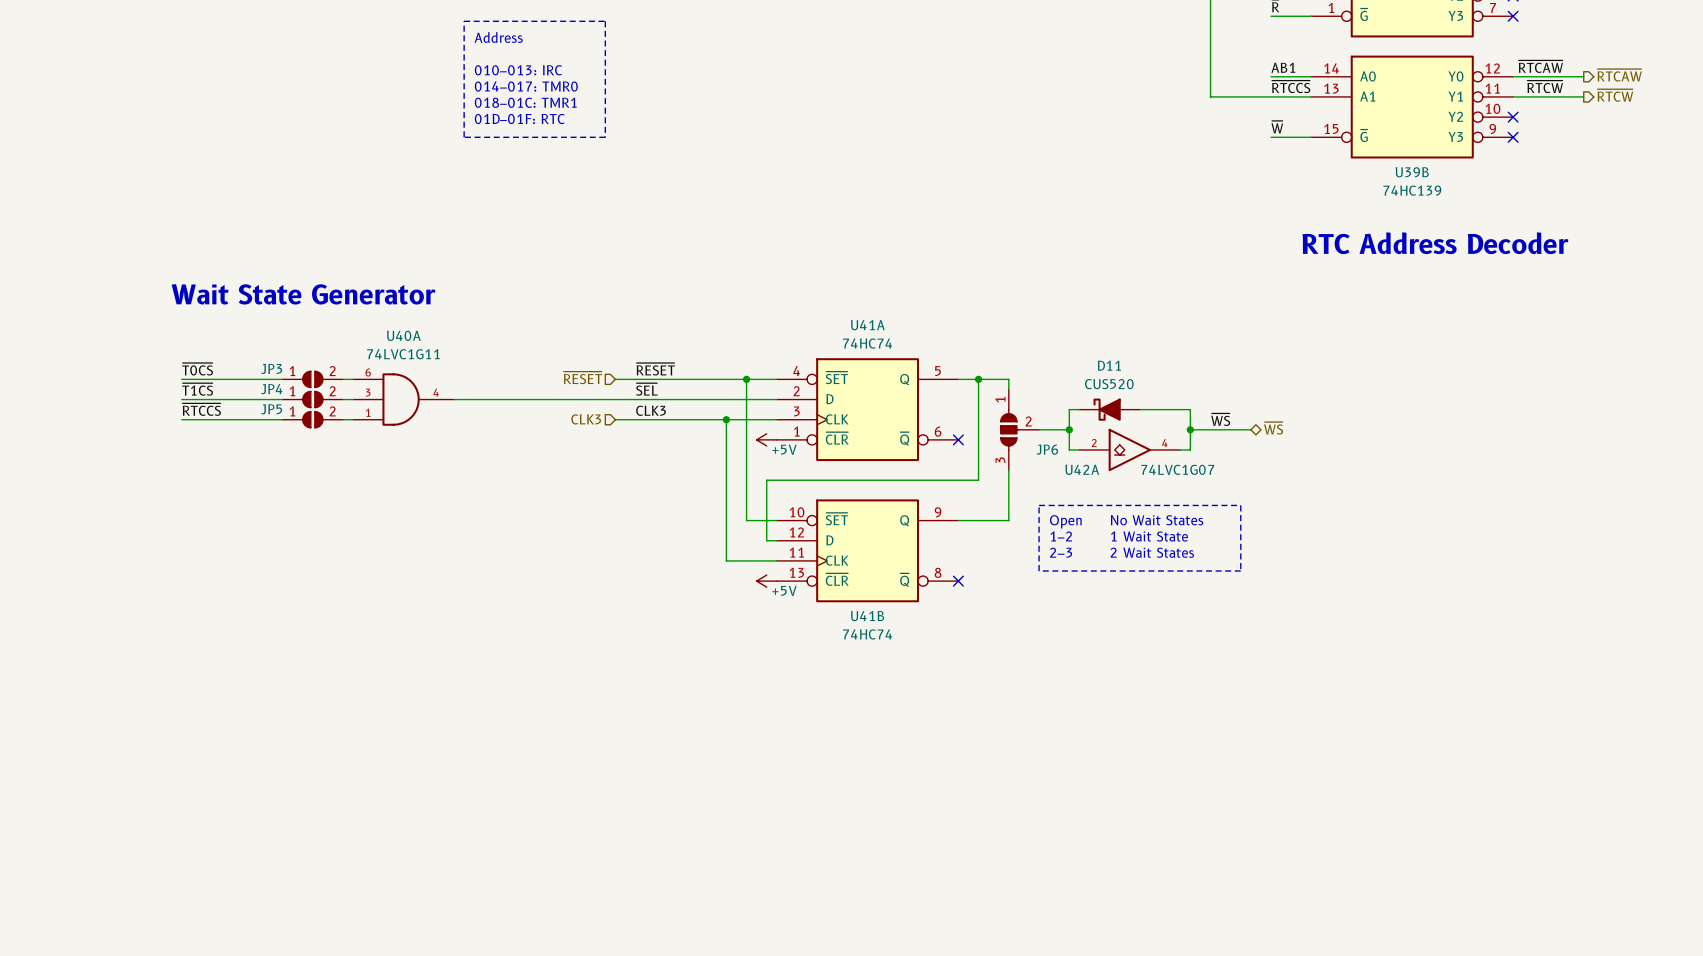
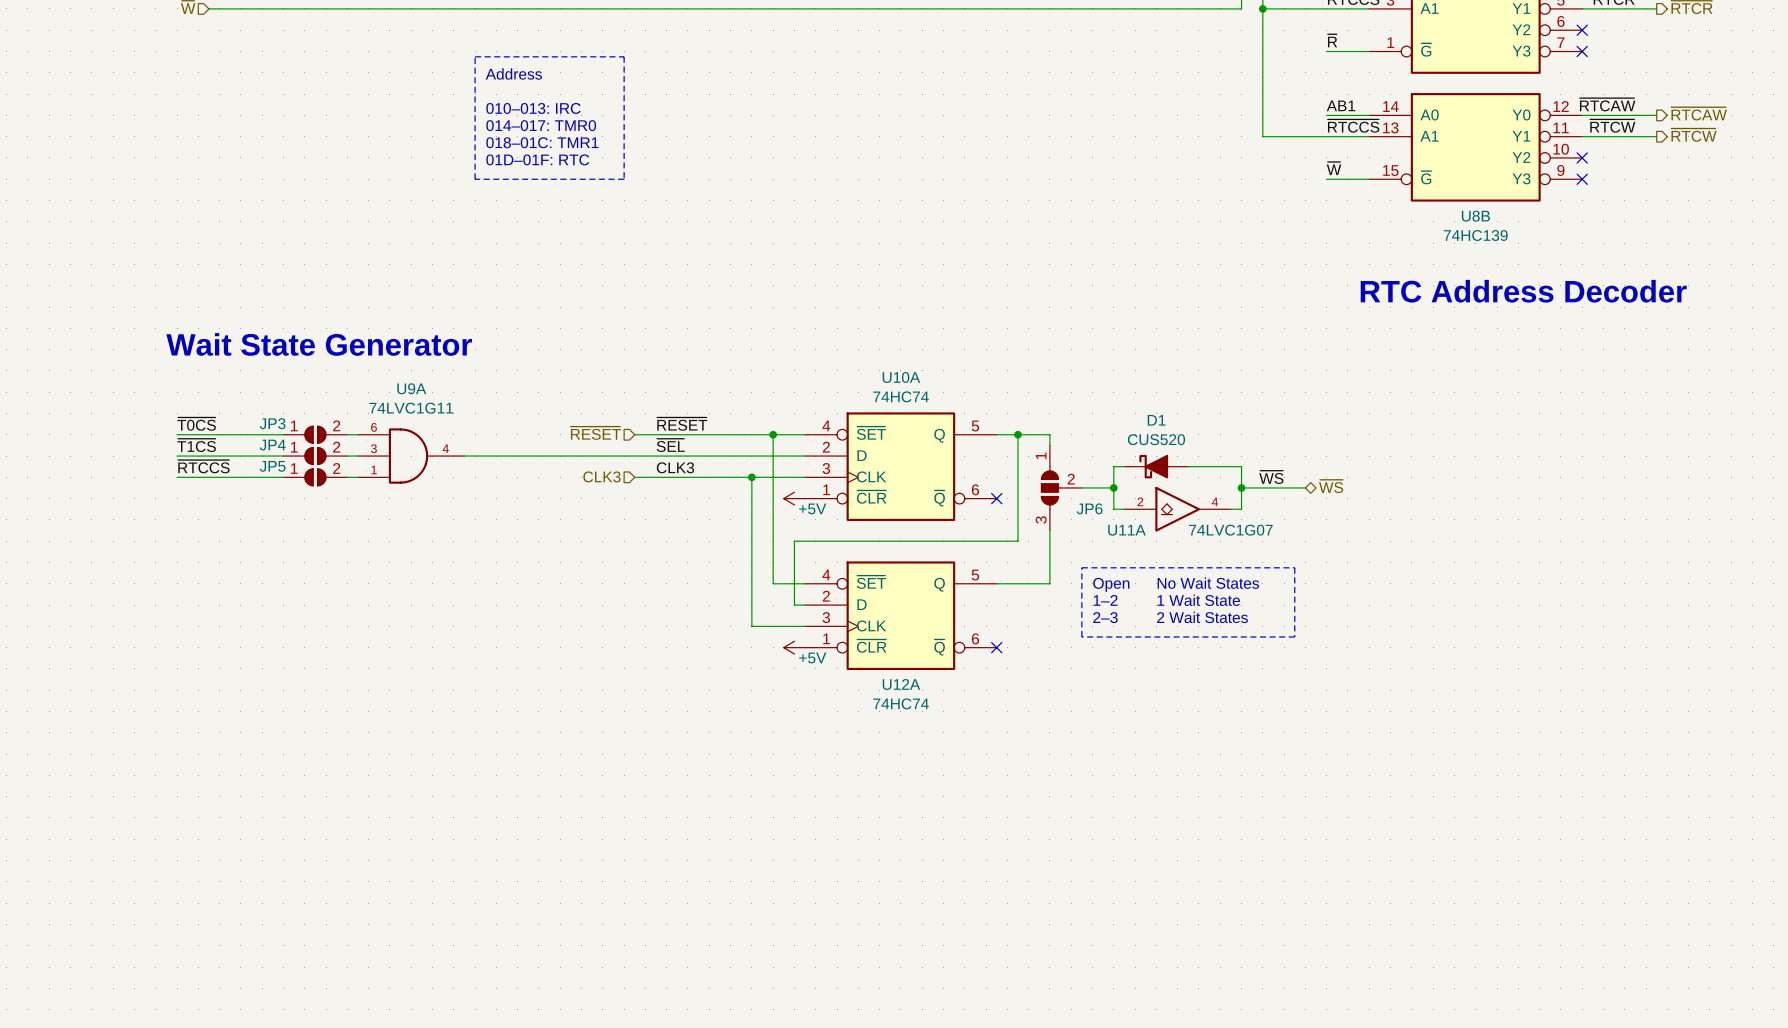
U39B name: U39B (1412, 172) -> U8B (1475, 216)
U41A name: U41A (867, 325) -> U10A (901, 377)
U40A name: U40A (403, 335) -> U9A (411, 388)
D11 name: D11 (1109, 365) -> D1 (1156, 420)
U42A name: U42A (1082, 469) -> U11A (1126, 530)
U41B pin number: 10 (797, 512) -> 4 (826, 575)
U41B pin number: 9 (938, 512) -> 5 (975, 575)
U41B pin number: 12 (796, 532) -> 2 (826, 596)
U41B pin number: 11 (796, 552) -> 3 (826, 617)
U41B pin number: 13 (796, 572) -> 1 (826, 638)
U41B pin number: 8 (938, 572) -> 6 (975, 638)
U41B name: U41B (867, 616) -> U12A (901, 684)

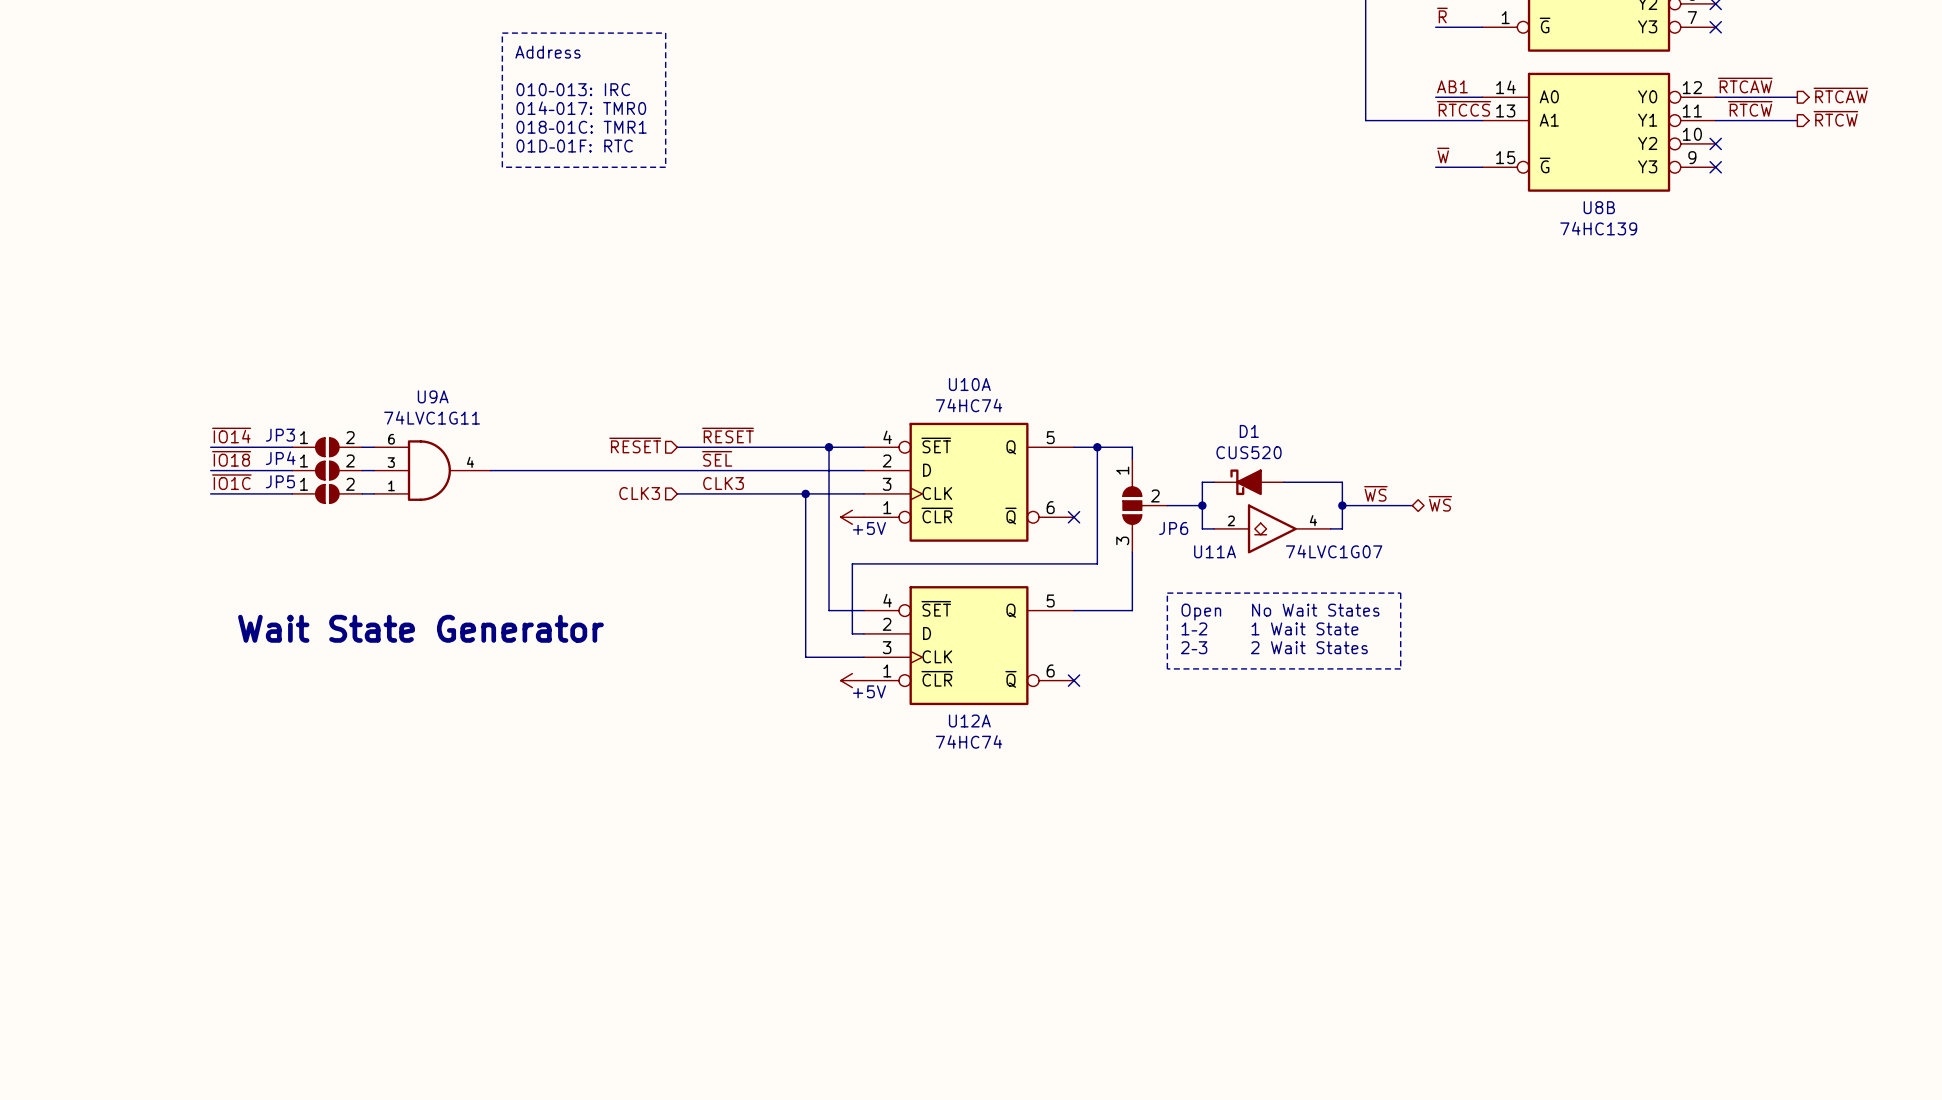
text: RTC Address Decoder (1523, 291) -> none
text: Wait State Generator (319, 344) -> none
label: ~{T0CS} (196, 424) -> none
label: none -> ~{IO14} (231, 435)
wire: (177, 434) (208, 434) -> none
label: ~{T1CS} (196, 445) -> ~{IO1C} (231, 482)
label: none -> ~{IO18} (231, 458)
wire: (177, 456) (208, 456) -> none
label: ~{RTCCS} (203, 466) -> none
wire: (177, 477) (208, 477) -> none
text: none -> Wait State Generator (420, 628)

